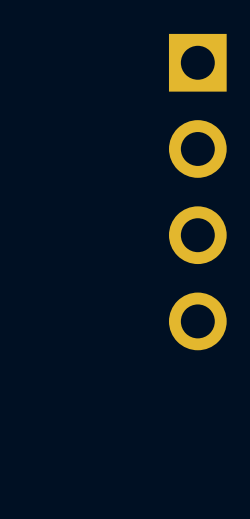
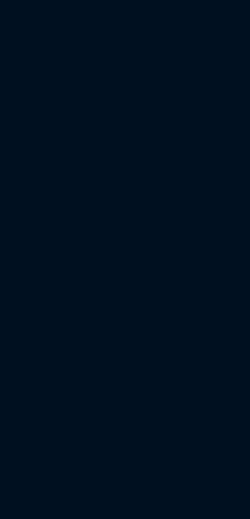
part: (197, 192) -> none

